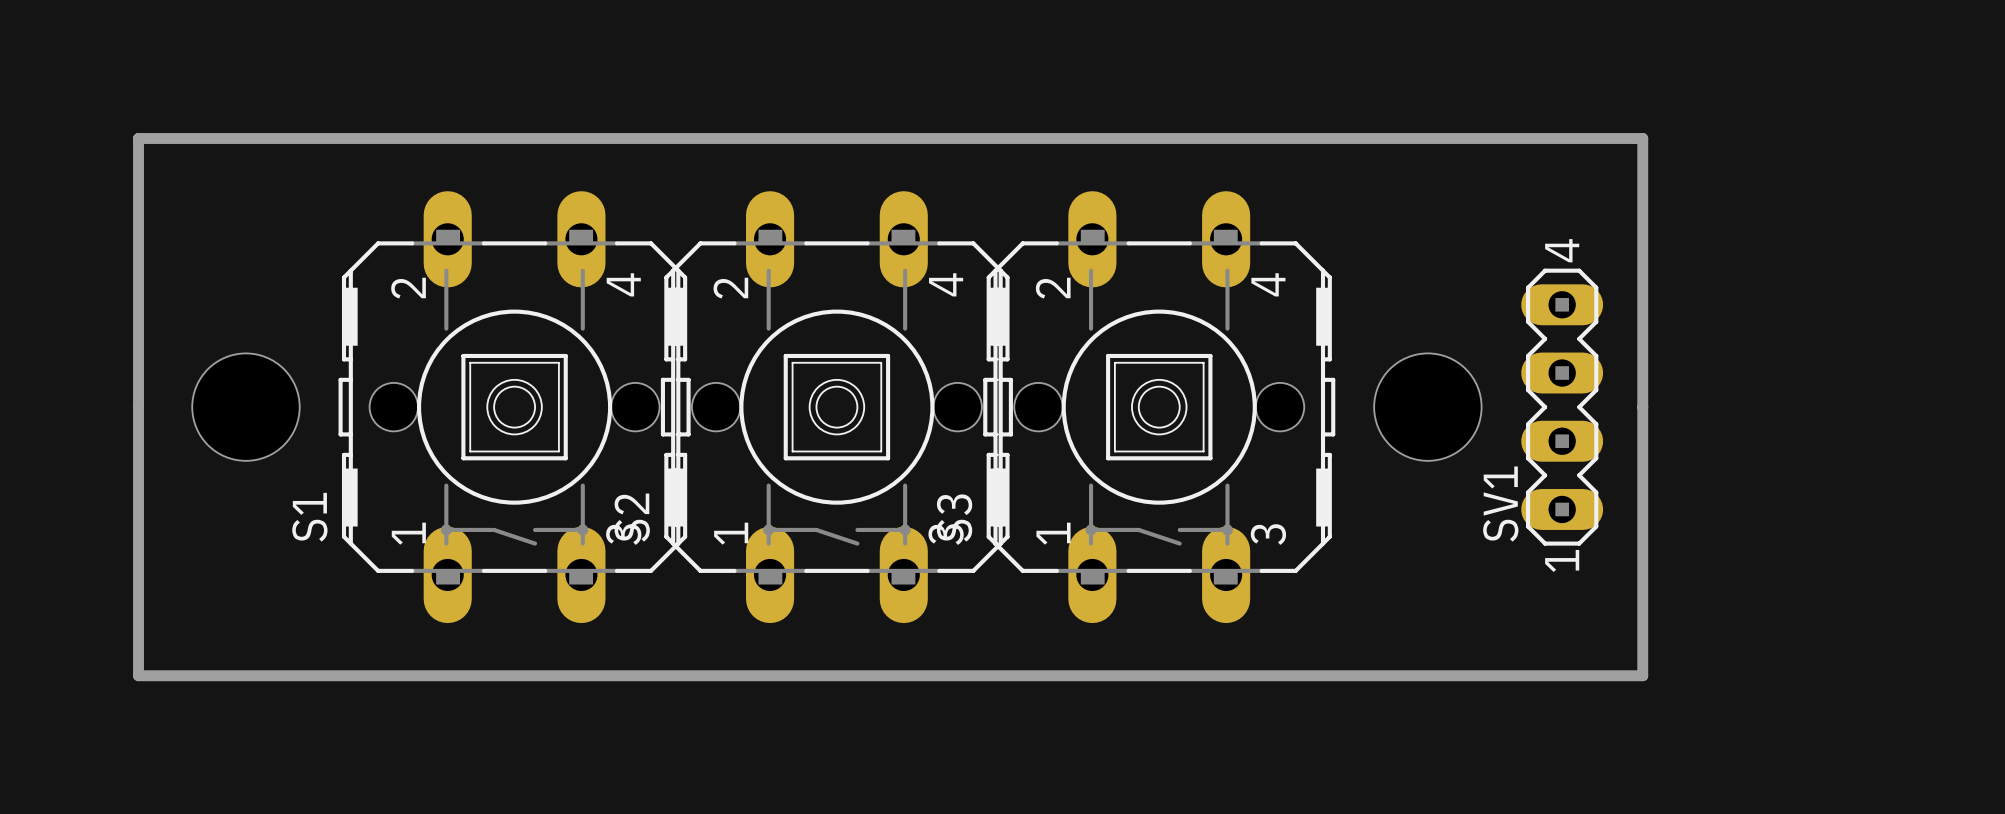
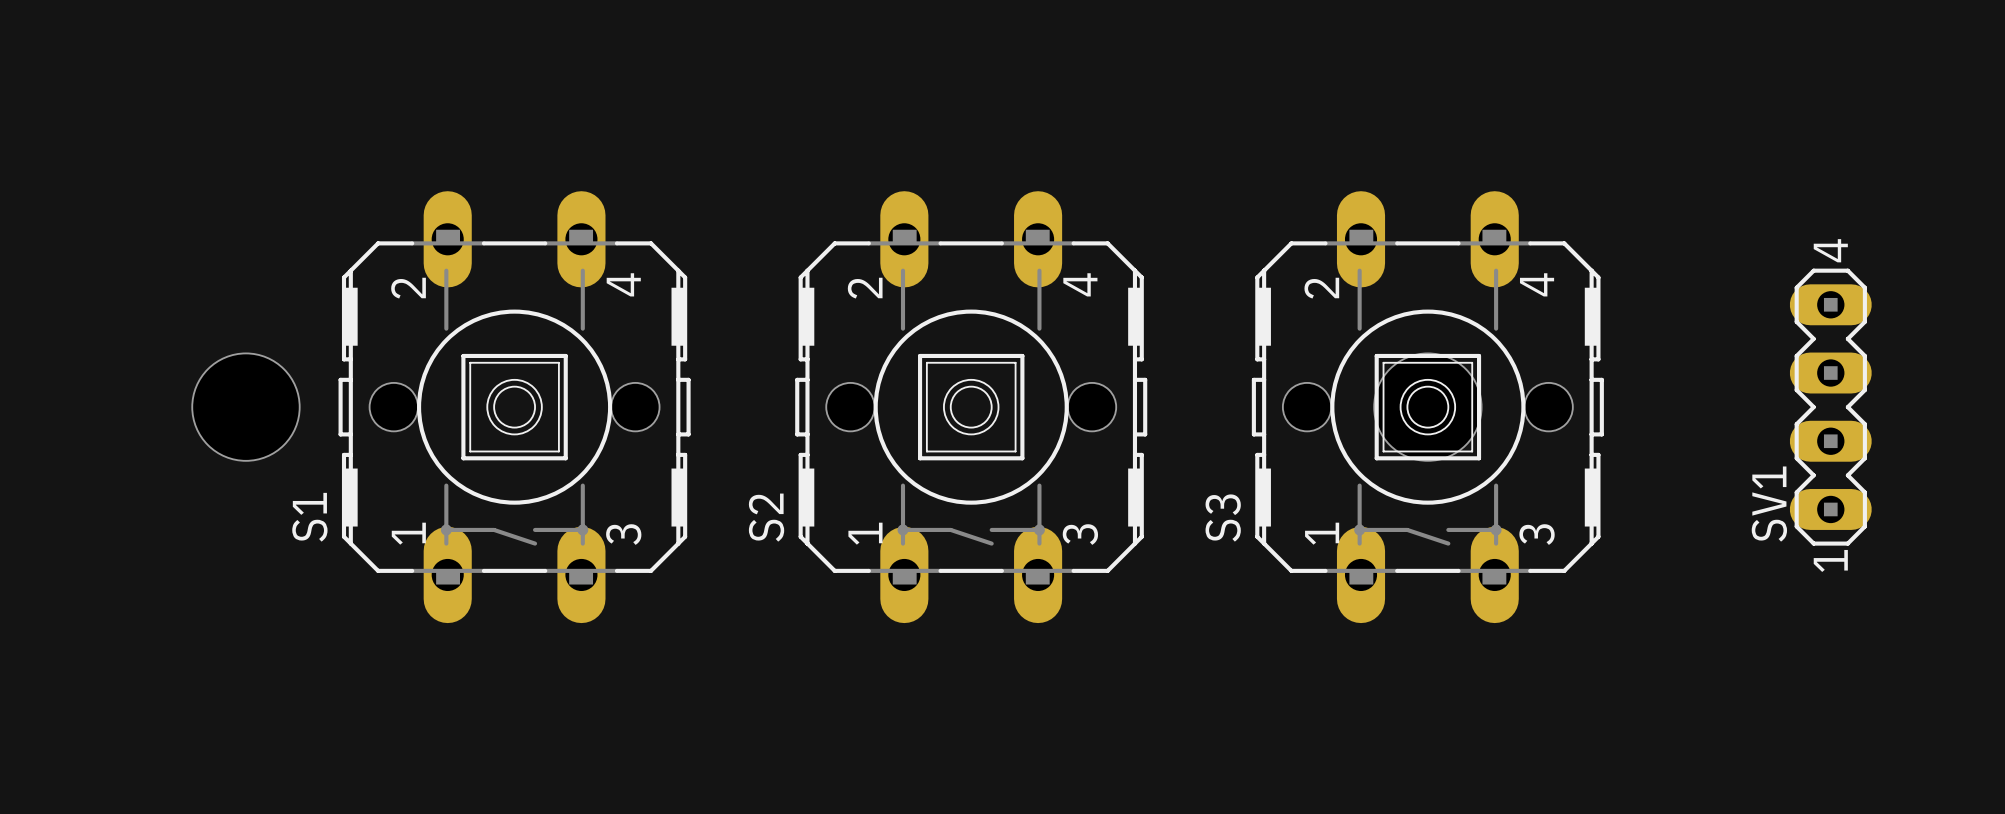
board edge: (138, 138) (1642, 138) (1642, 675) (138, 675) (138, 138) -> none
S2 position: (836, 407) -> (971, 407)
S3 position: (1159, 407) -> (1427, 407)
SV1 position: (1562, 407) -> (1830, 407)

